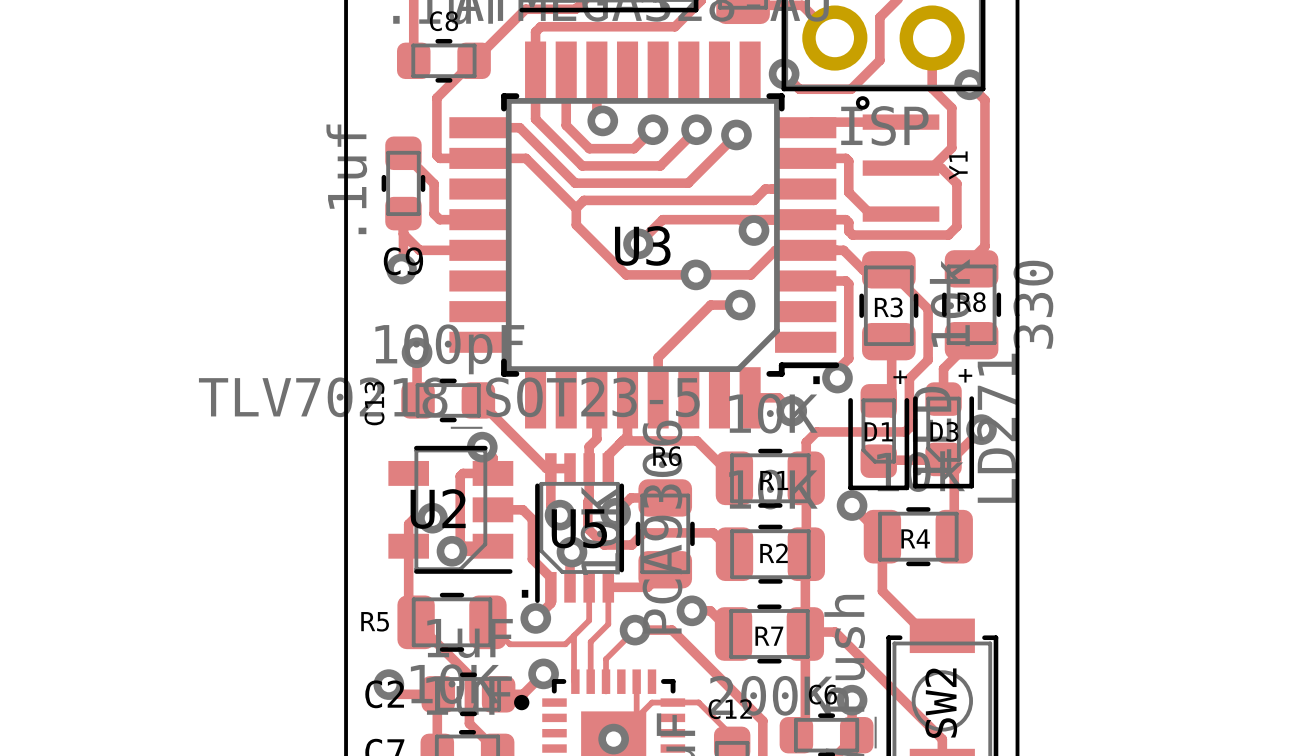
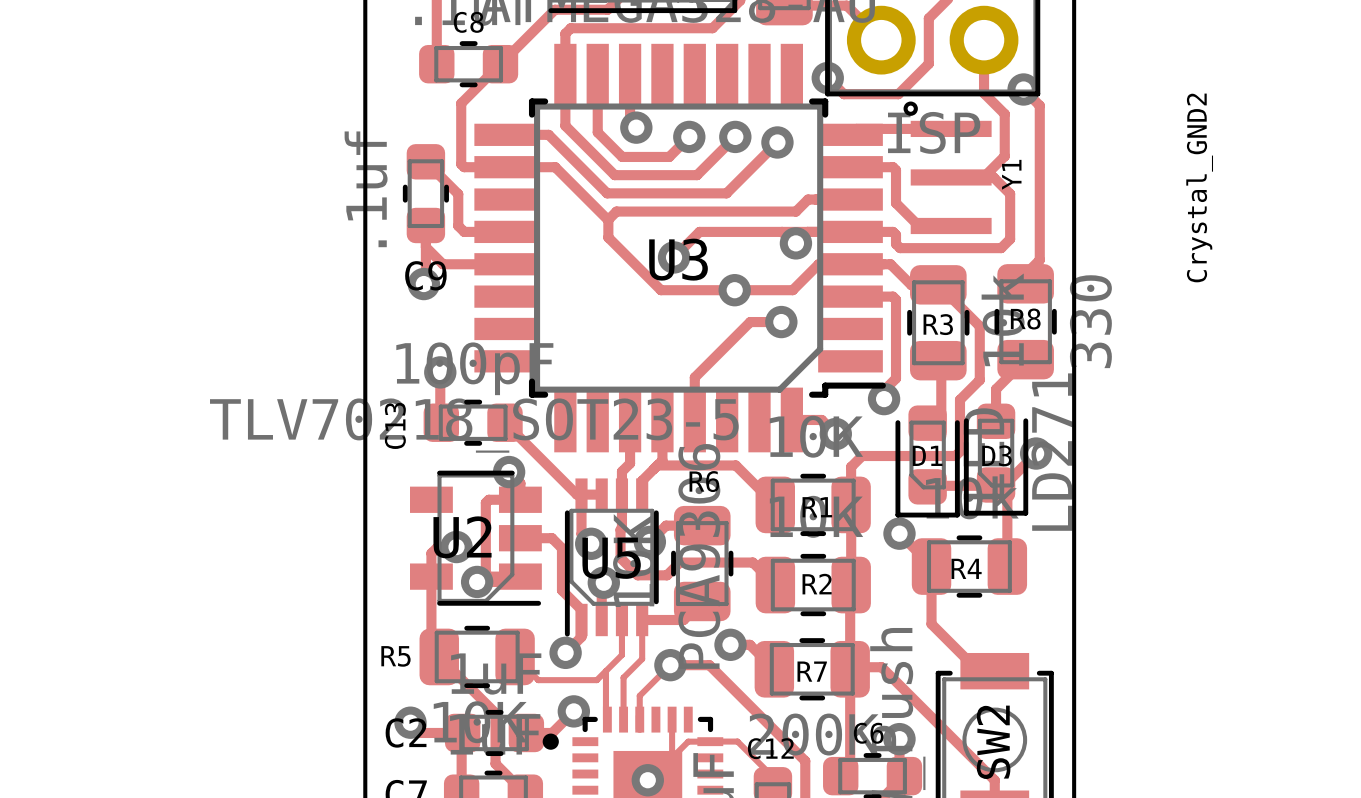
Y1 value: none -> Crystal_GND2 (1199, 187)
text: + (965, 375) -> none
text: + (900, 377) -> none
text: . (816, 380) -> none
text: . (525, 593) -> none

